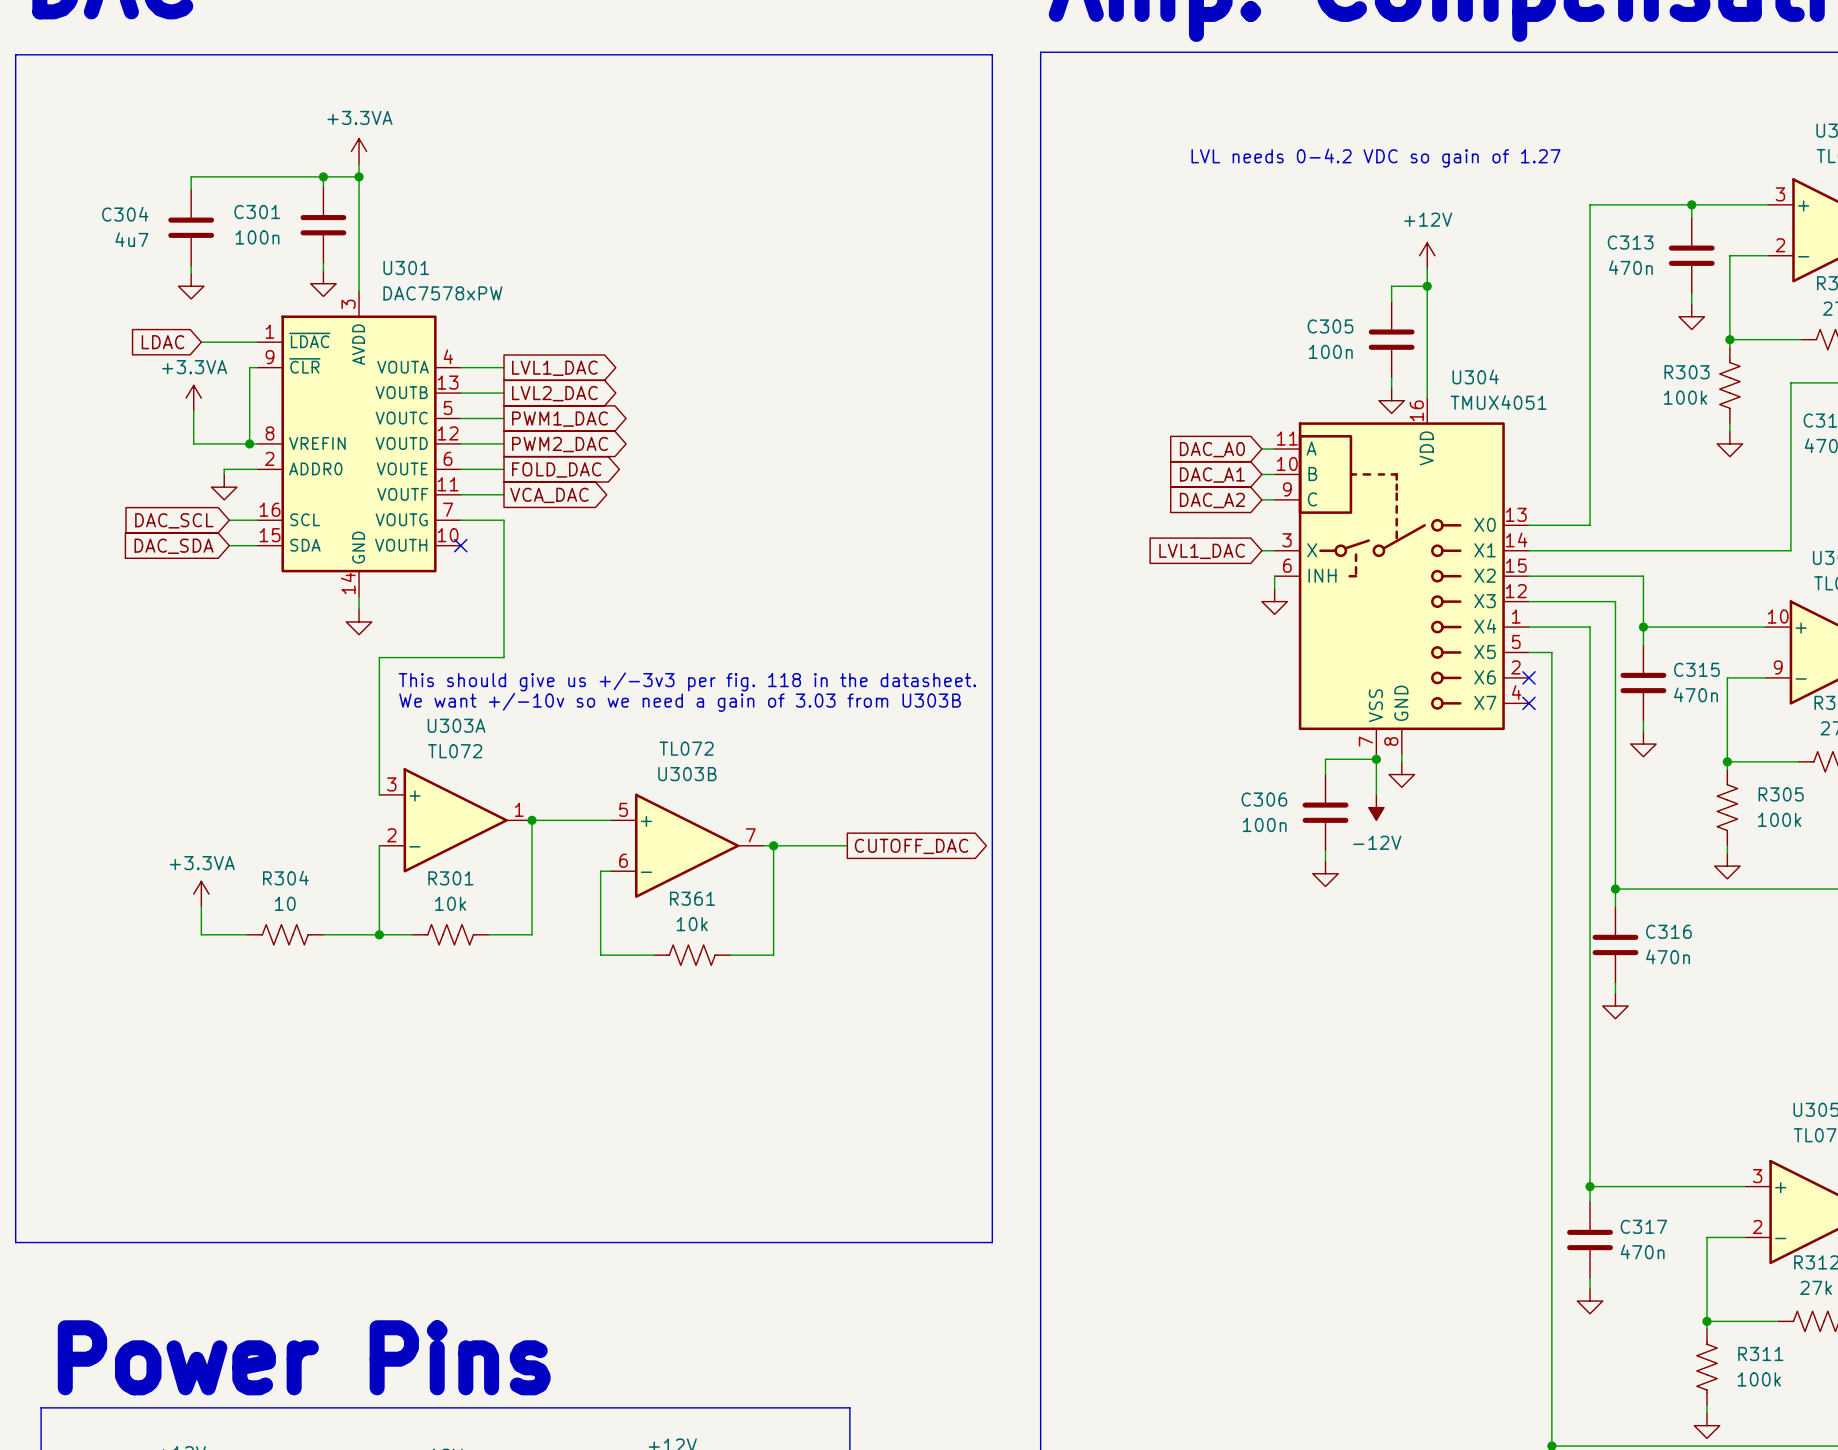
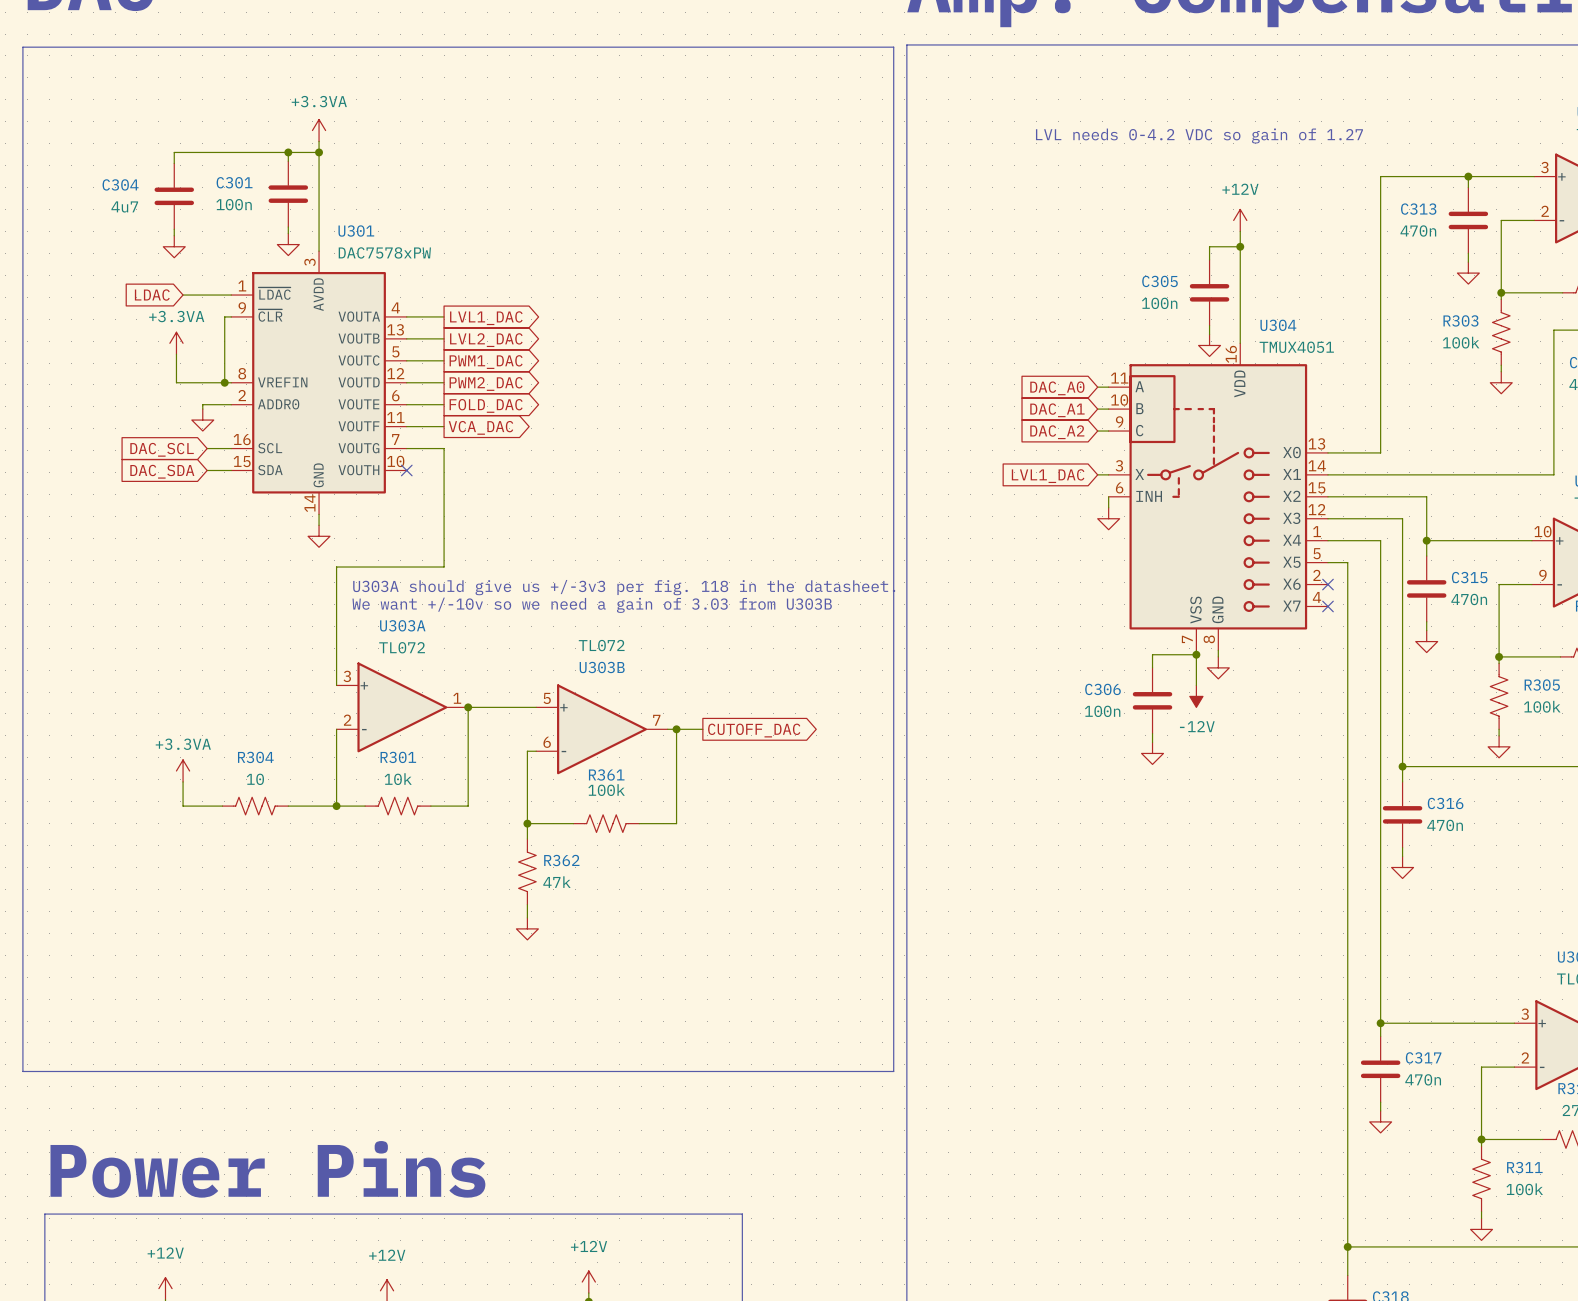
line: (992, 54) (992, 1242) -> (865, 47) (893, 47) (893, 1071) (865, 1071)
text: This should give us +/-3v3 per fig. 118 in the datasheet. (687, 681) -> U303A should give us +/-3v3 per fig. 118 in the datasheet. (624, 587)
wire: (804, 845) (847, 845) -> none
global label position: CUTOFF_DAC (911, 846) -> CUTOFF_DAC (754, 730)
R361 value: 10k (692, 924) -> 100k (606, 790)
wire: none -> (527, 823) (527, 838)
junction: none -> (527, 823)
R362: none -> 47k (527, 871)
wire: none -> (527, 904) (527, 917)
power symbol: none -> (527, 928)

